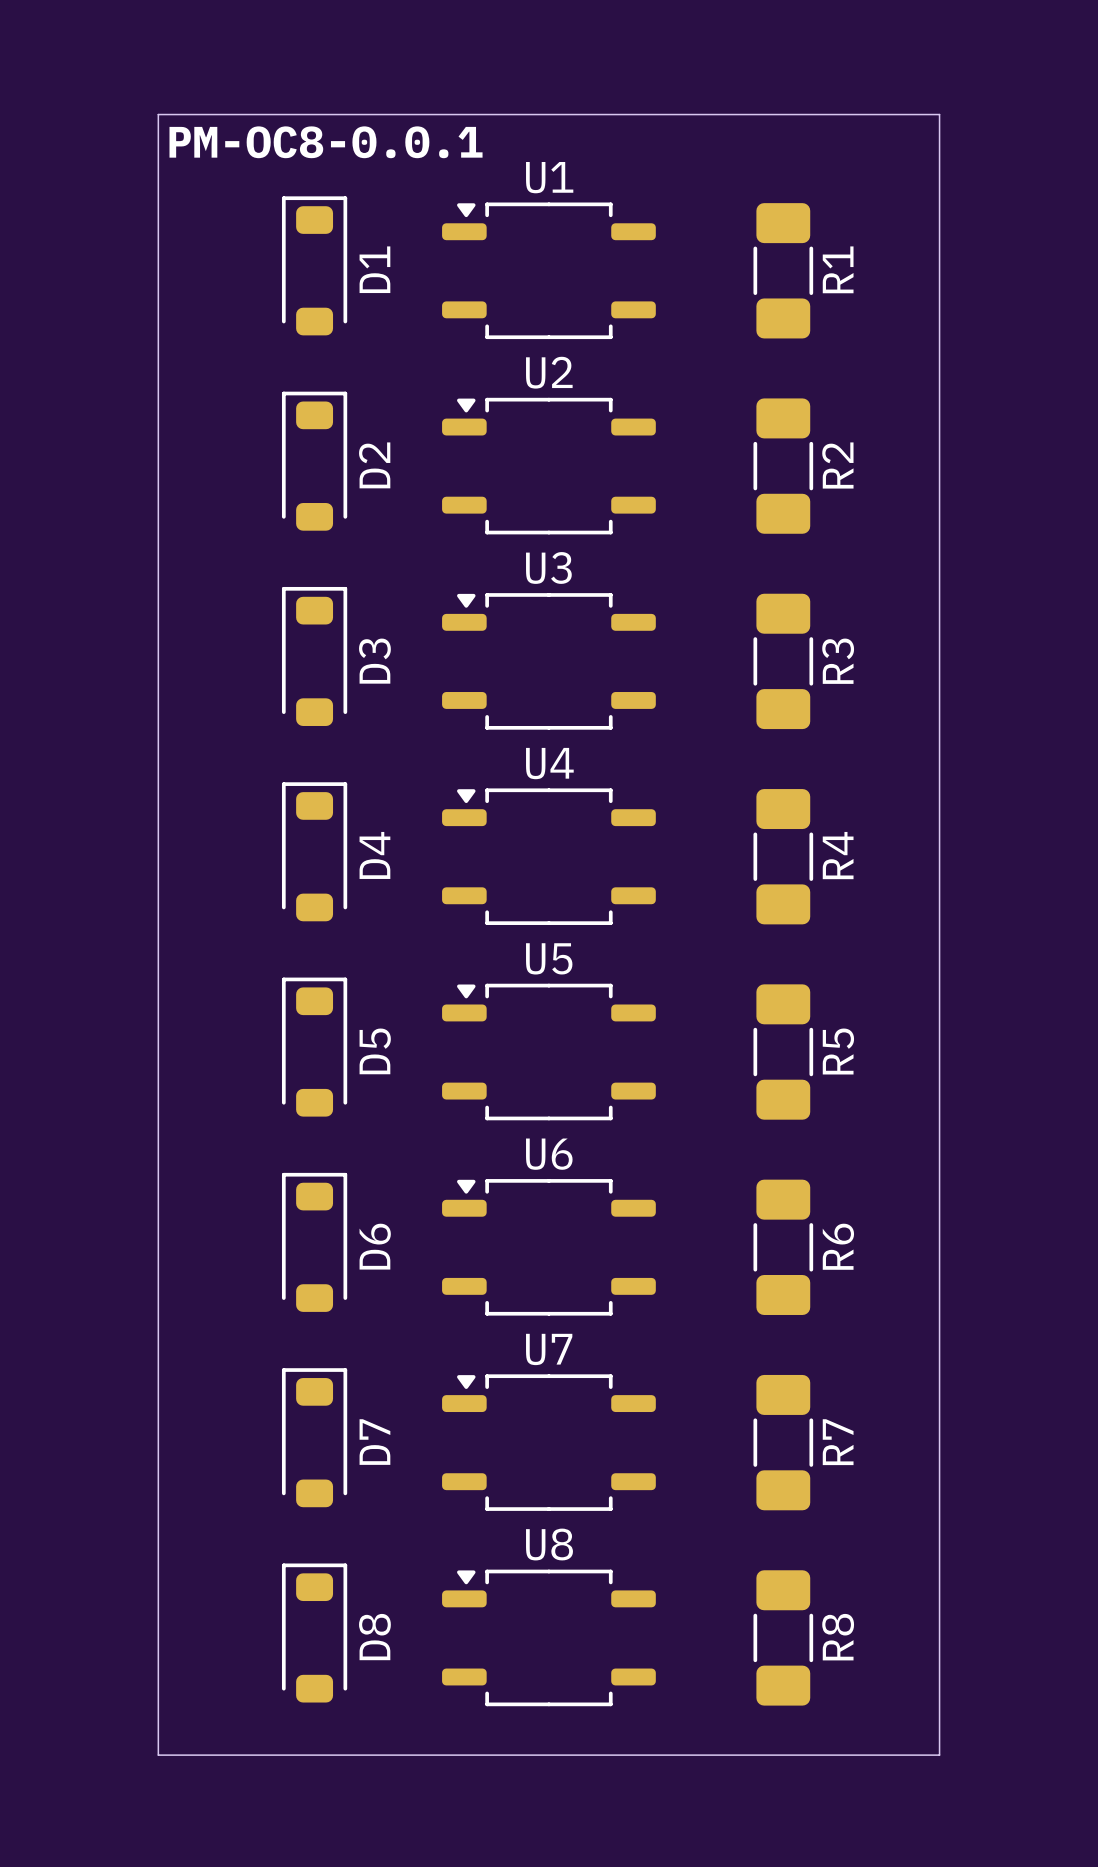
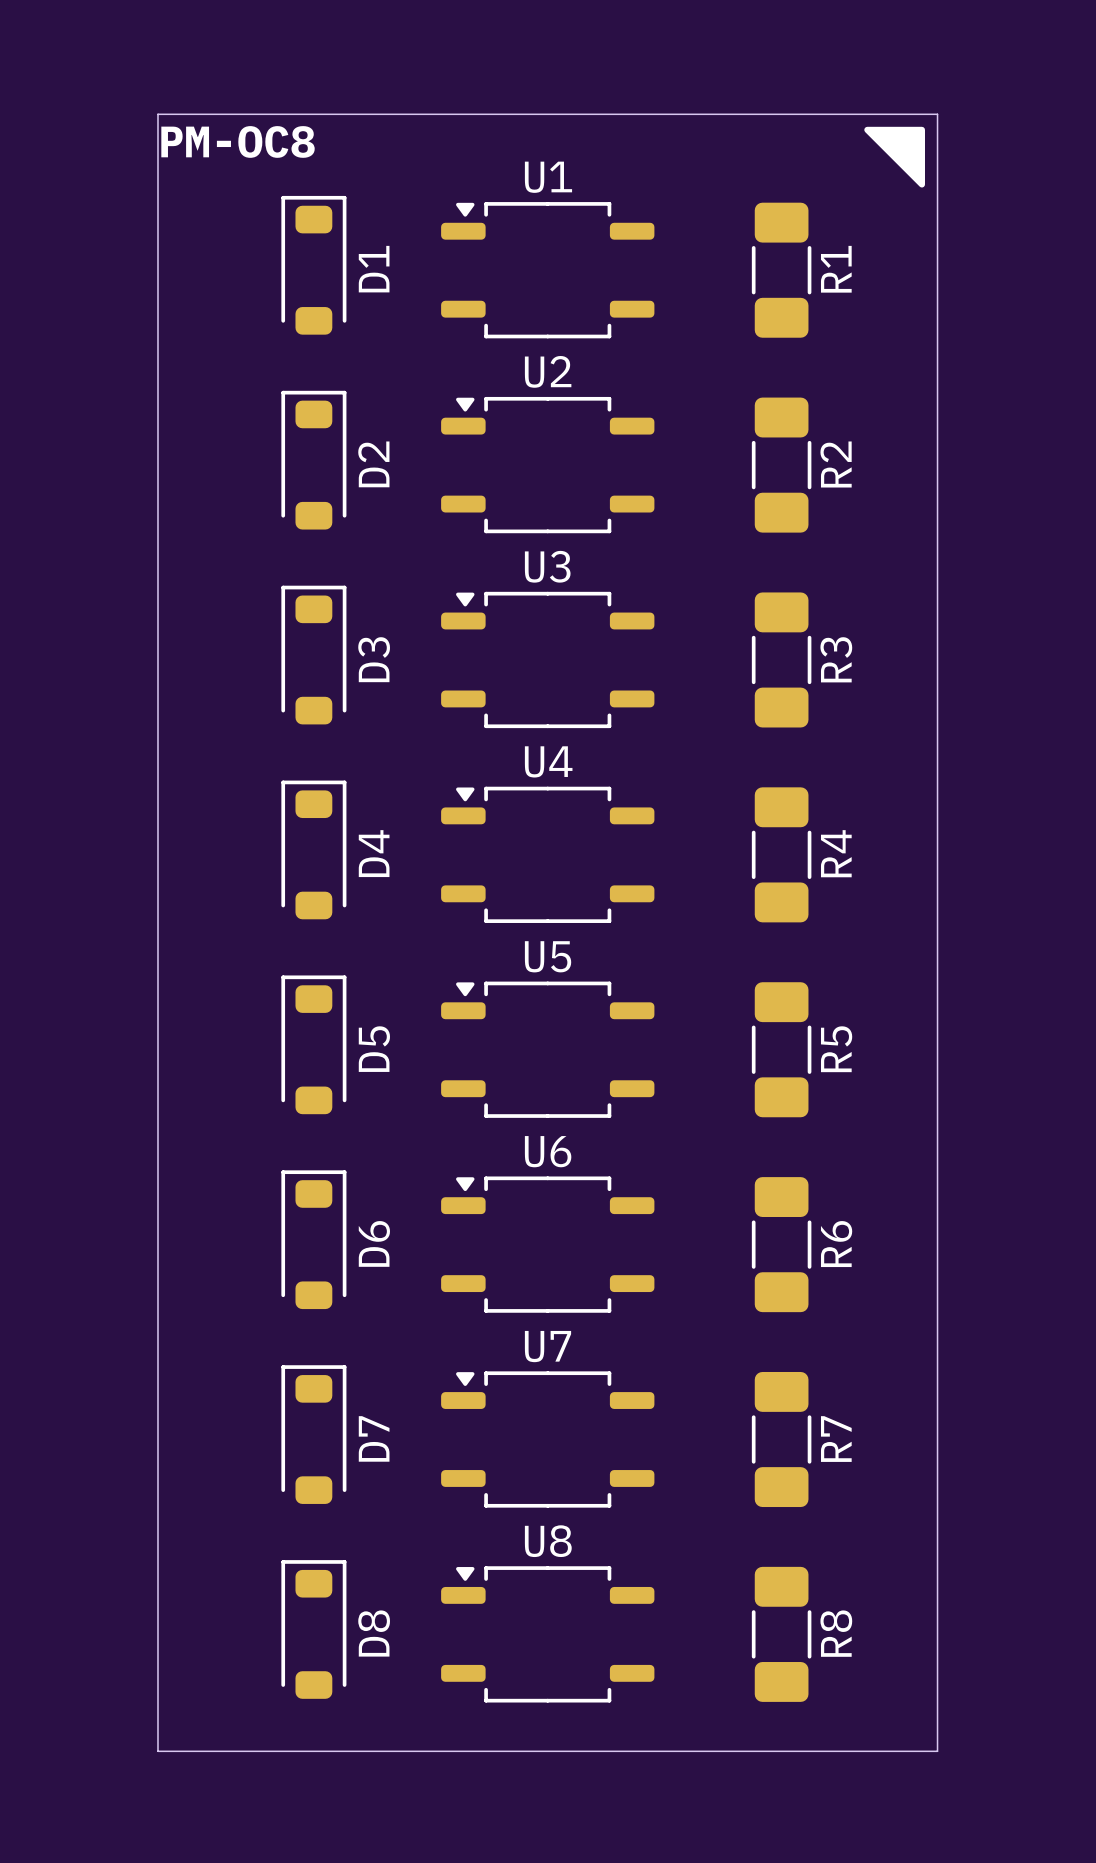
drawing: none -> [864, 126, 926, 188]
text: PM-OC8-0.0.1 (326, 142) -> PM-OC8 (238, 141)

